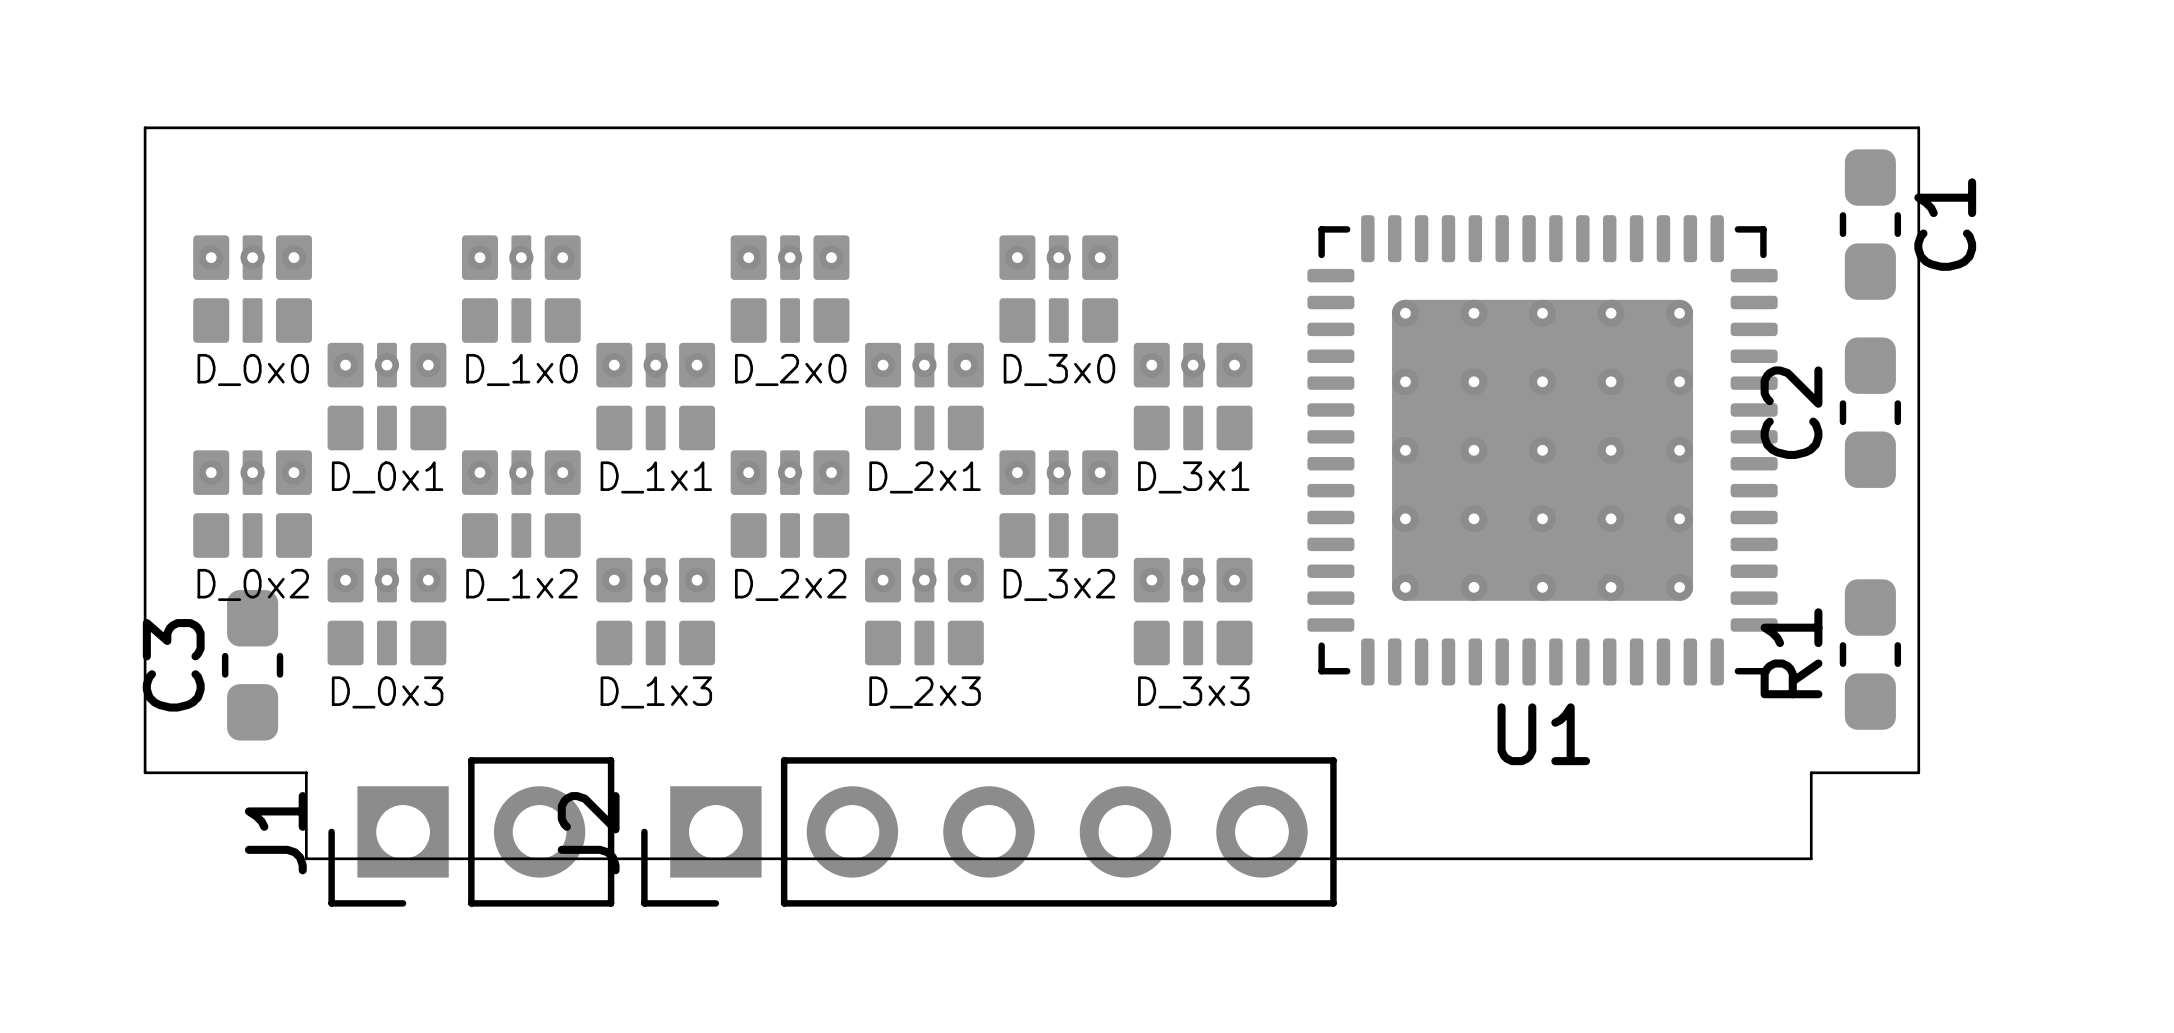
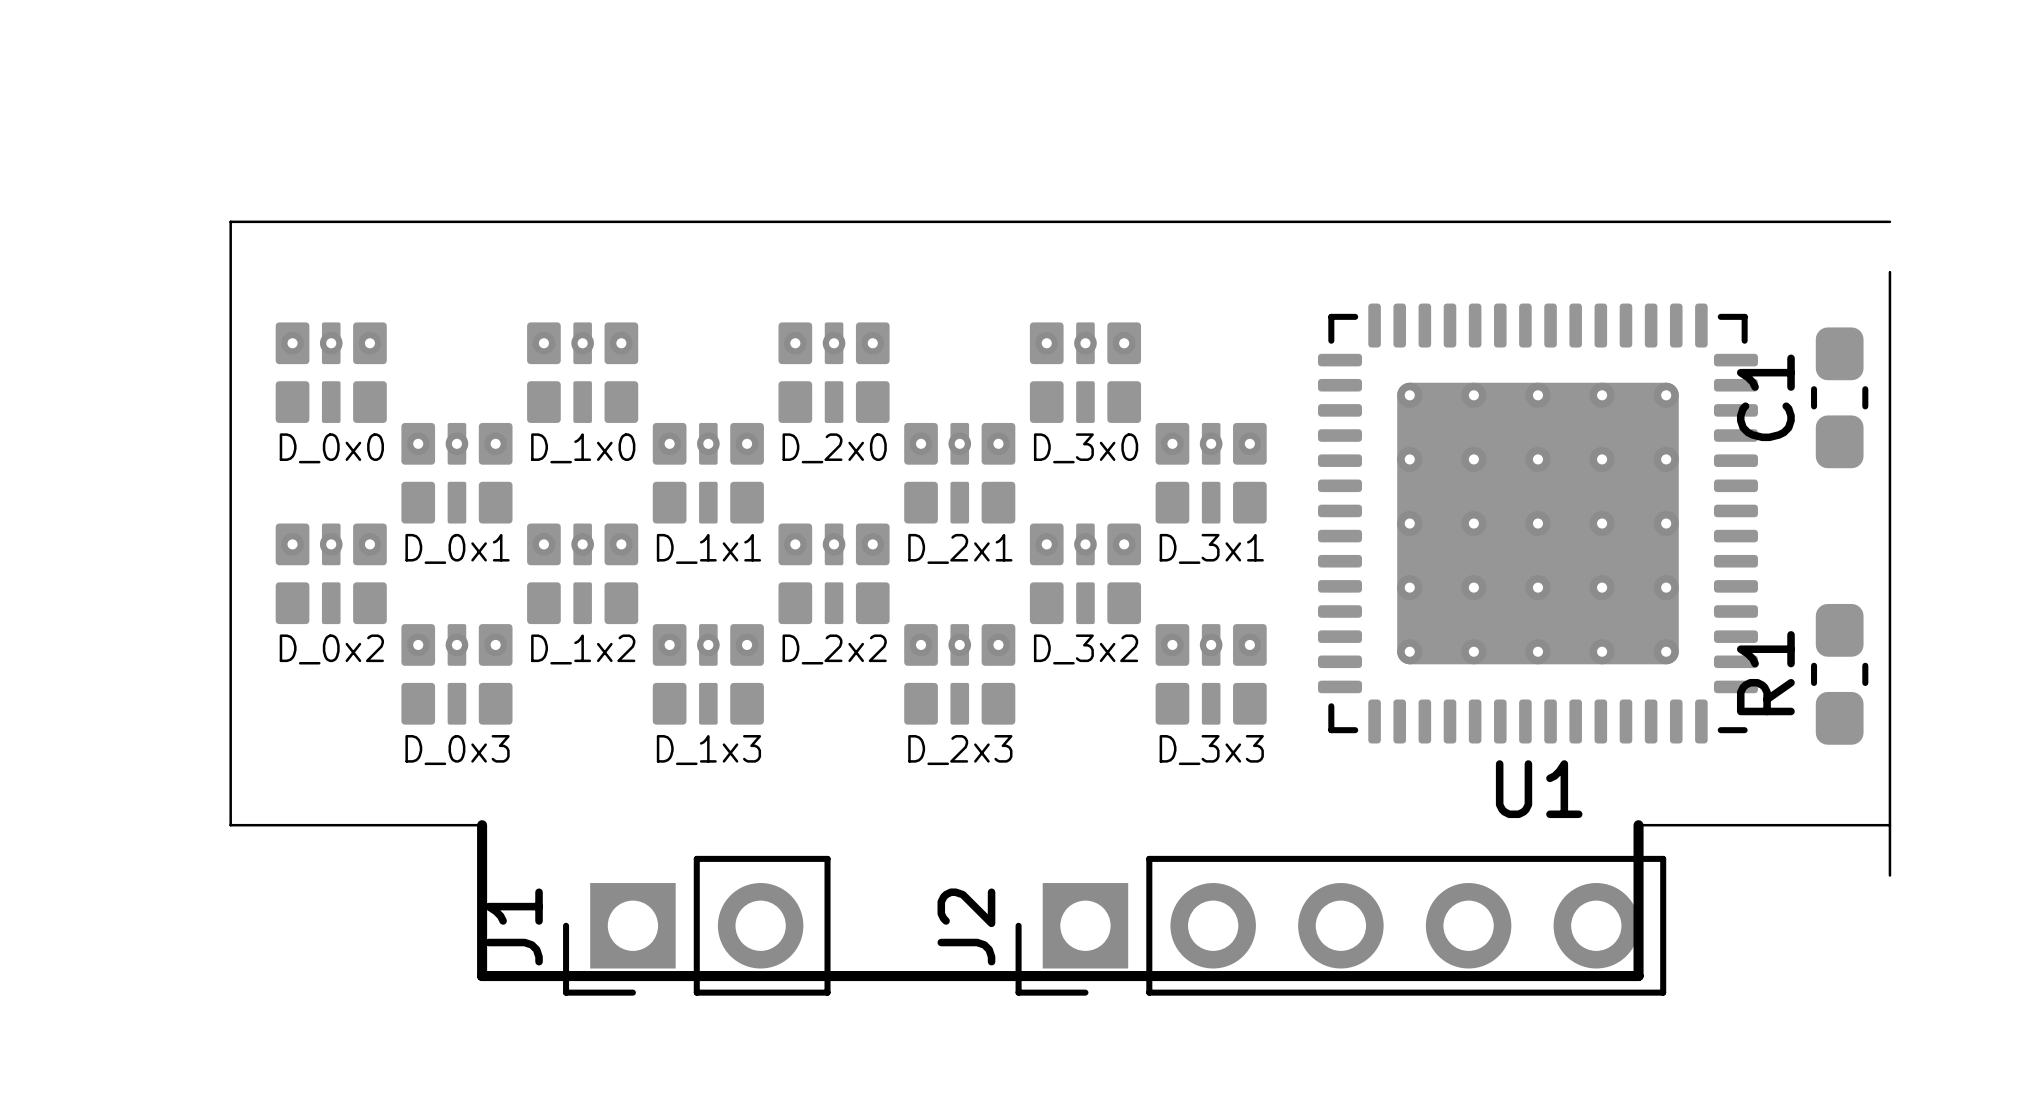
board edge: (1918, 127) (1918, 181) -> (1889, 825) (1889, 875)
C1 position: (1870, 224) -> (1839, 397)
C1 name position: C1 (1945, 224) -> C1 (1765, 397)
C2: (1870, 412) -> none
R1 position: (1870, 654) -> (1839, 674)
C3: (252, 665) -> none
board edge: (306, 772) (306, 858) (1811, 858) (1811, 772) -> (381, 825) (482, 825) (482, 976) (1638, 976) (1638, 825) (1789, 825)
J1 position: (471, 831) -> (696, 925)
J2 position: (988, 831) -> (1340, 925)

